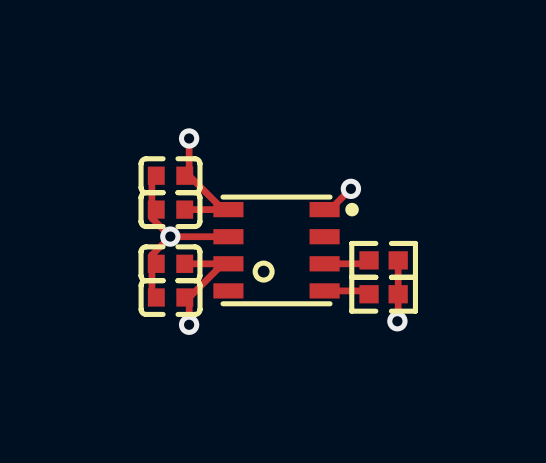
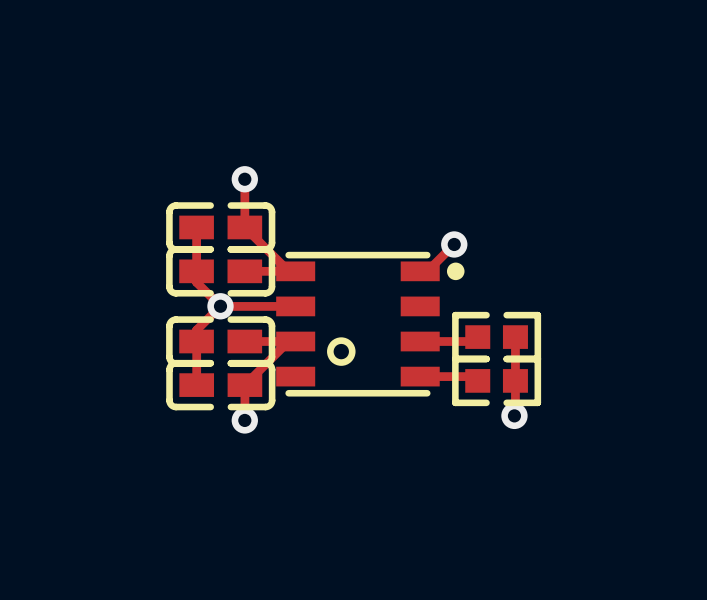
part footprint: [138, 156, 203, 196] -> [166, 202, 276, 253]
part footprint: [138, 190, 203, 230] -> [166, 246, 276, 297]
part footprint: [138, 244, 203, 284] -> [166, 316, 276, 367]
part footprint: [138, 278, 203, 317] -> [166, 359, 276, 411]

